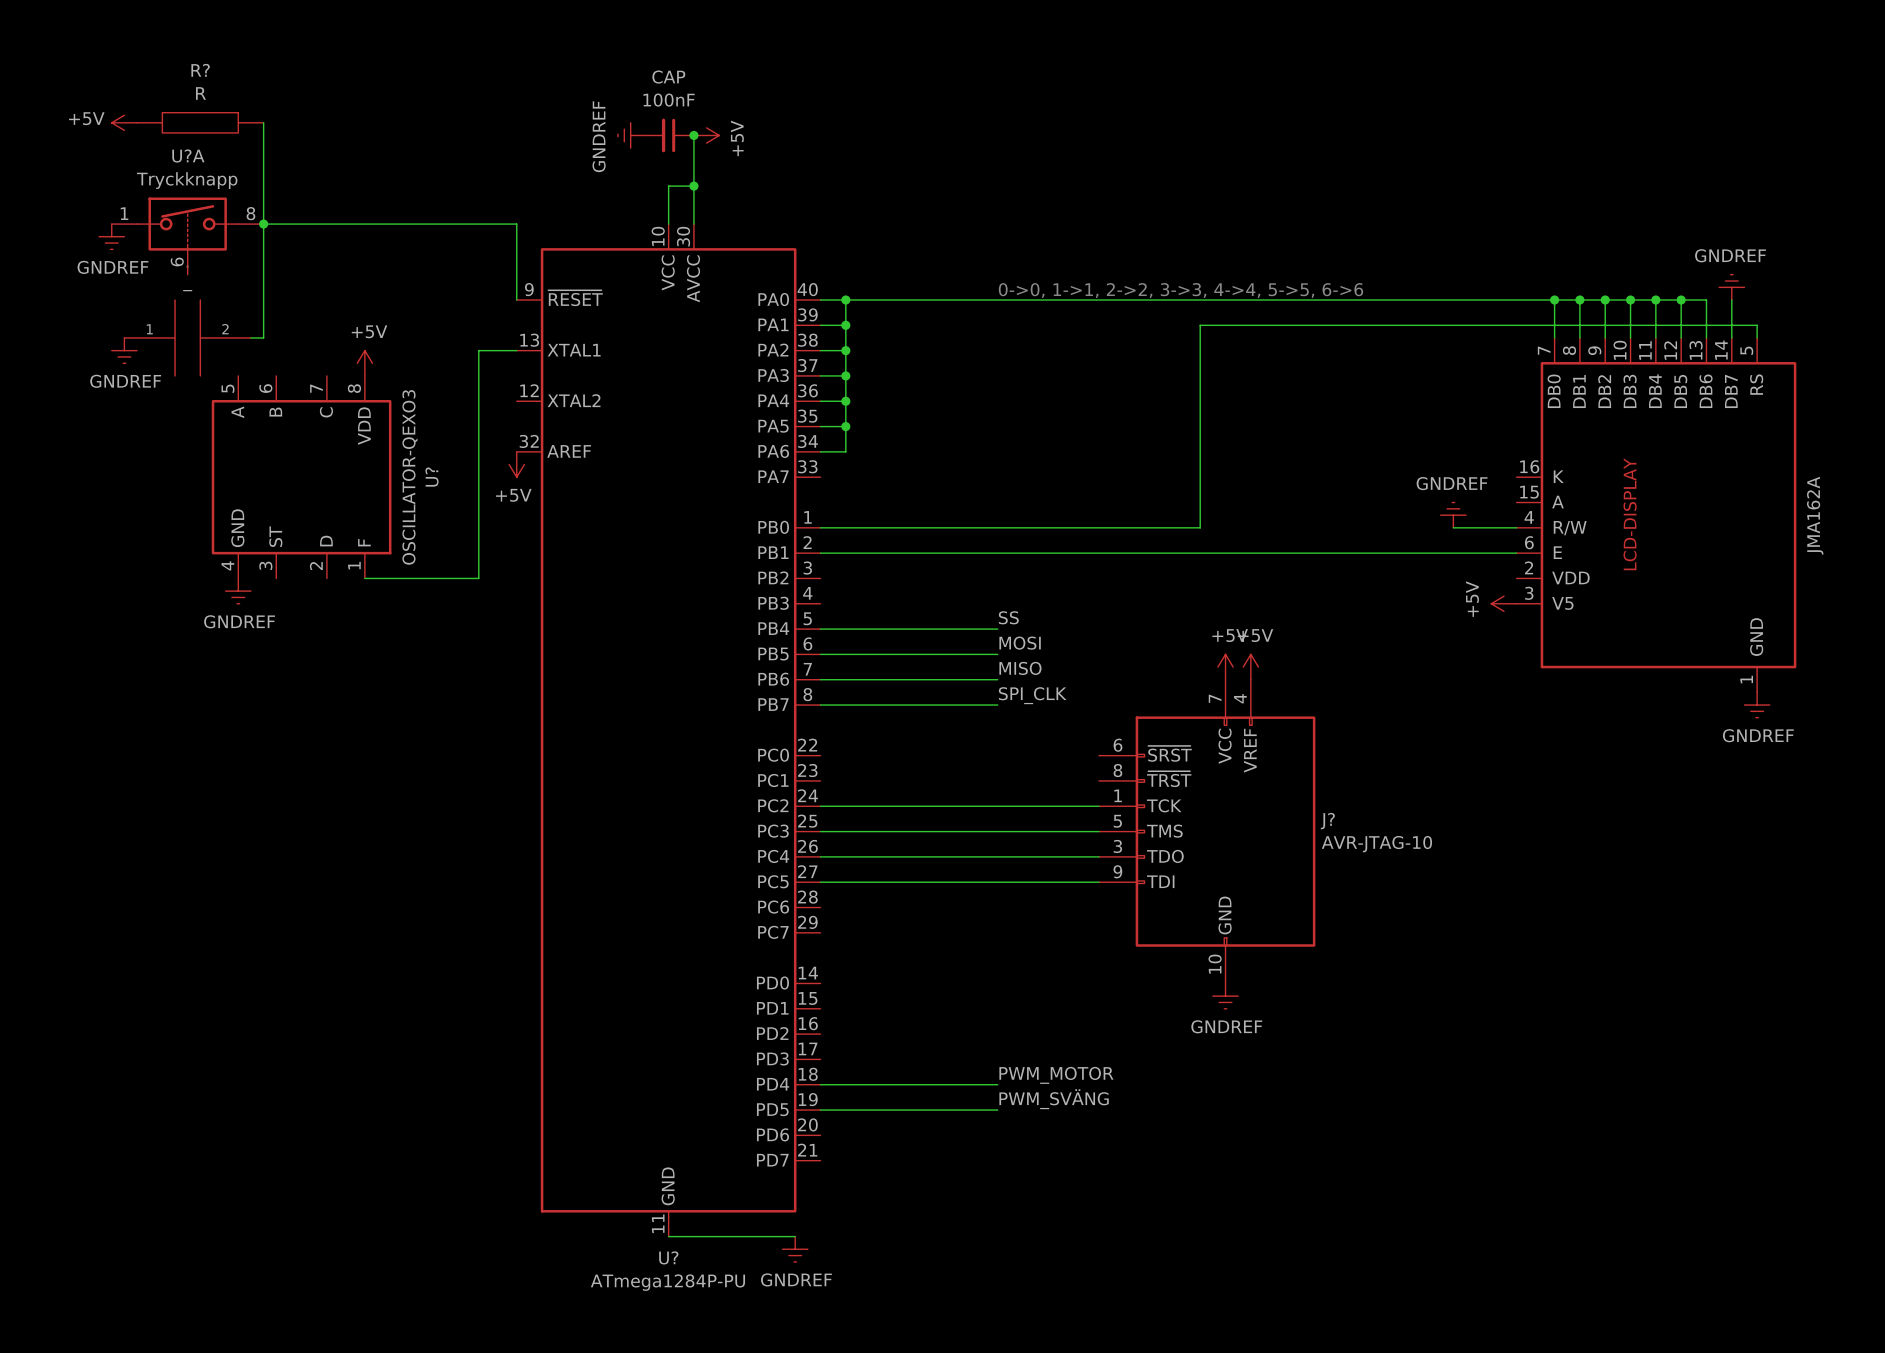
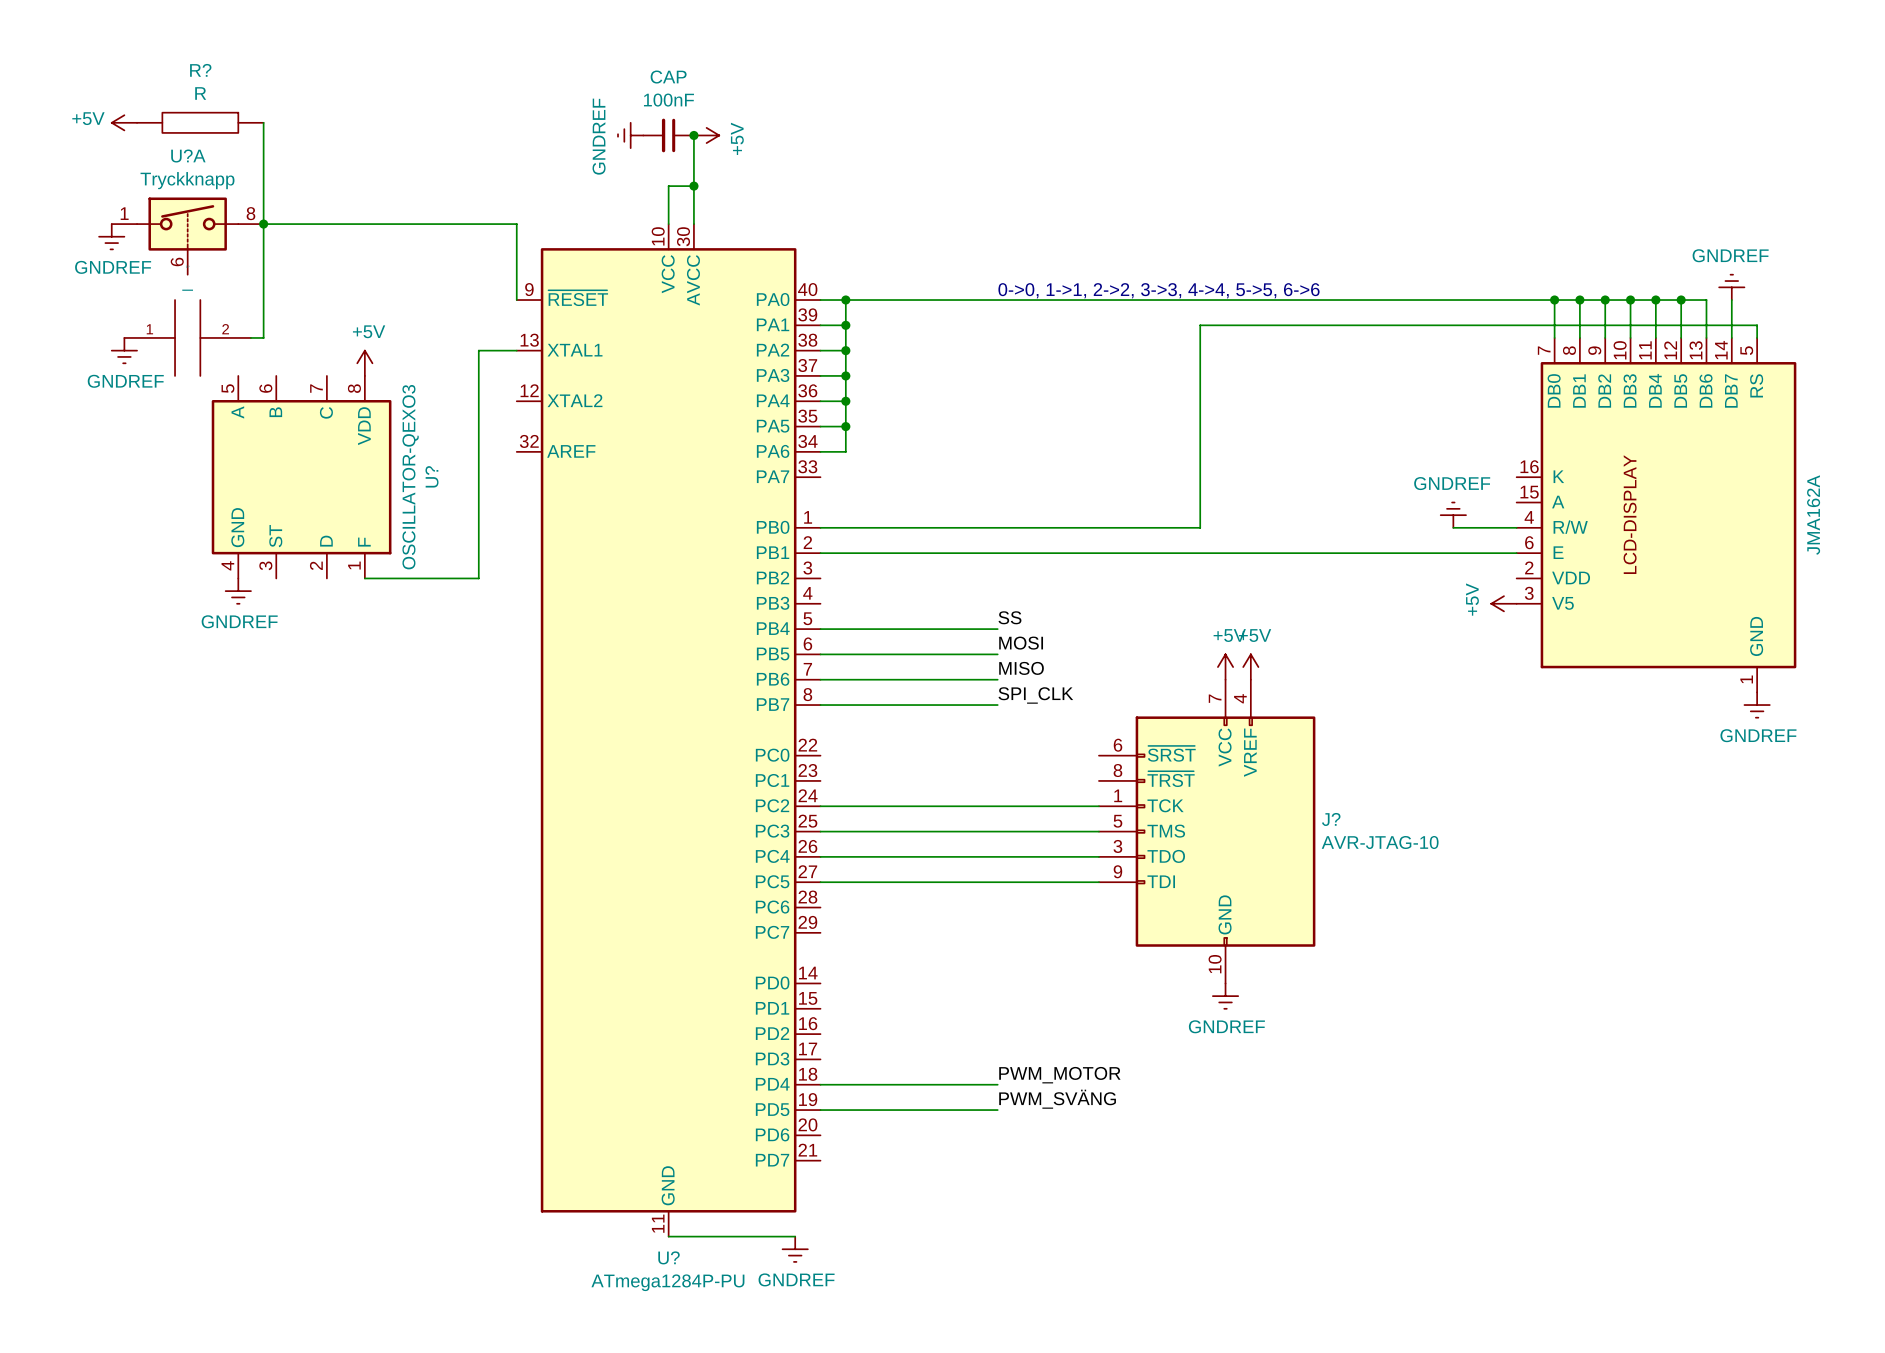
power symbol: +5V (516, 464) -> none

